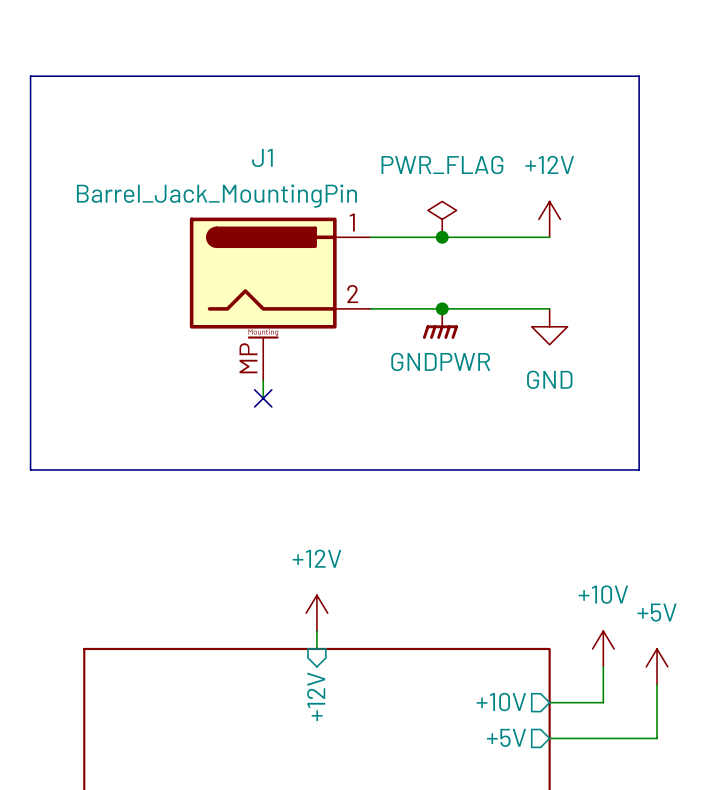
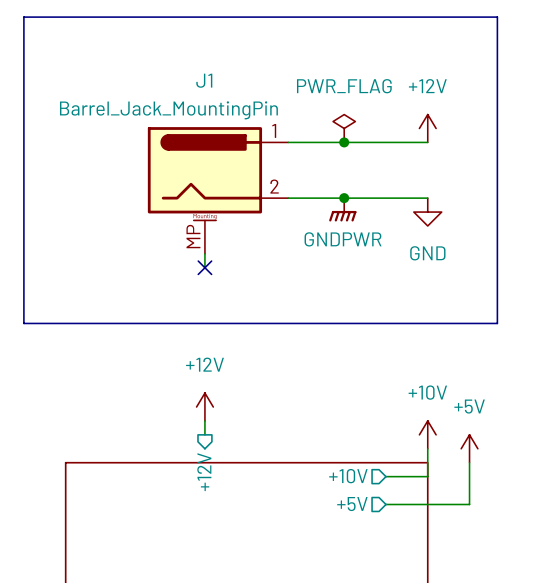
power symbol position: +12V (316, 613) -> +12V (204, 407)
wire: (316, 631) (316, 648) -> (204, 420) (204, 434)
wire: none -> (427, 448) (427, 476) (385, 476)
power symbol position: +10V (603, 648) -> +10V (427, 434)
power symbol position: +5V (657, 666) -> +5V (469, 448)
wire: (657, 684) (657, 738) (549, 738) -> none
sheet pin position: +12V (316, 696) -> +12V (204, 472)
wire: none -> (385, 504) (427, 504)
sheet pin position: +10V (501, 702) -> +10V (348, 476)
sheet pin position: +5V (506, 737) -> +5V (352, 504)

